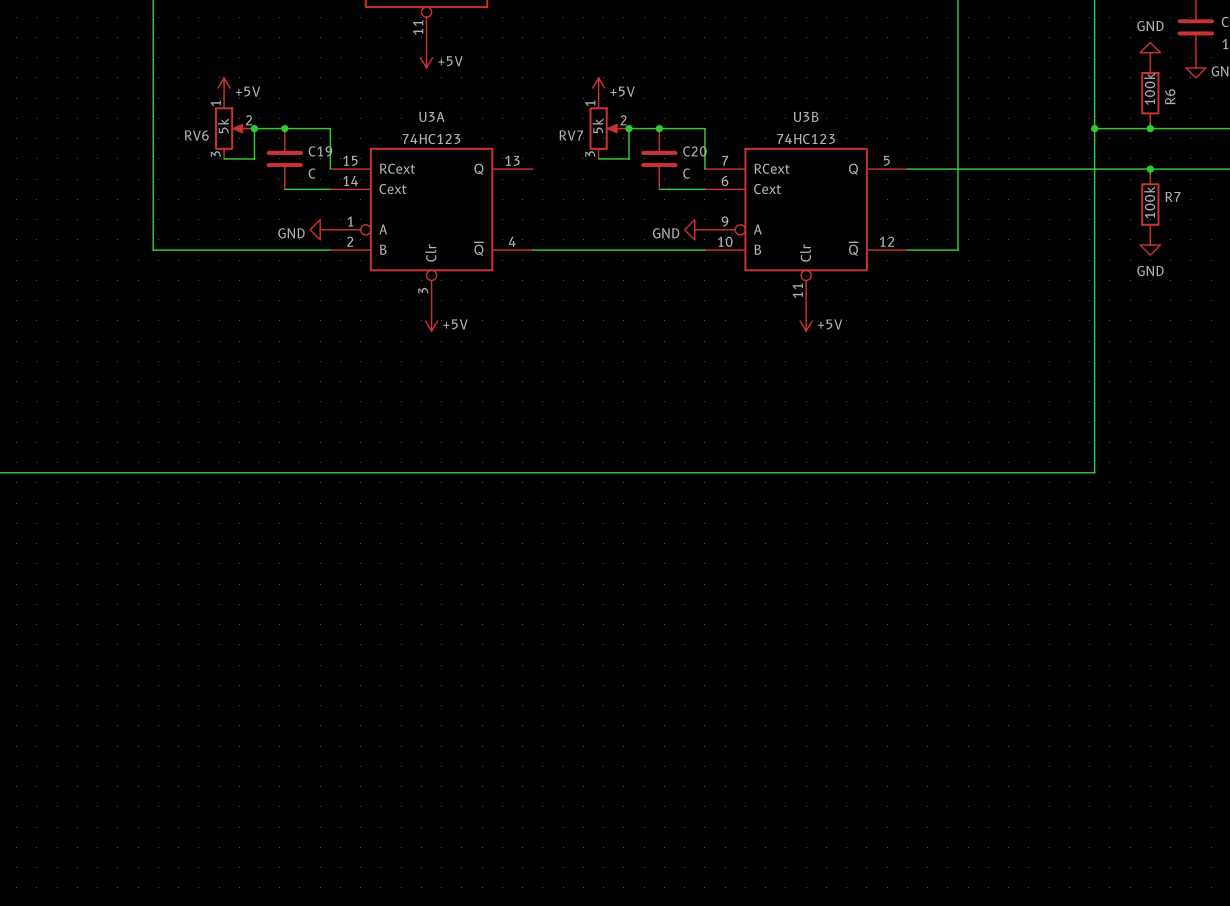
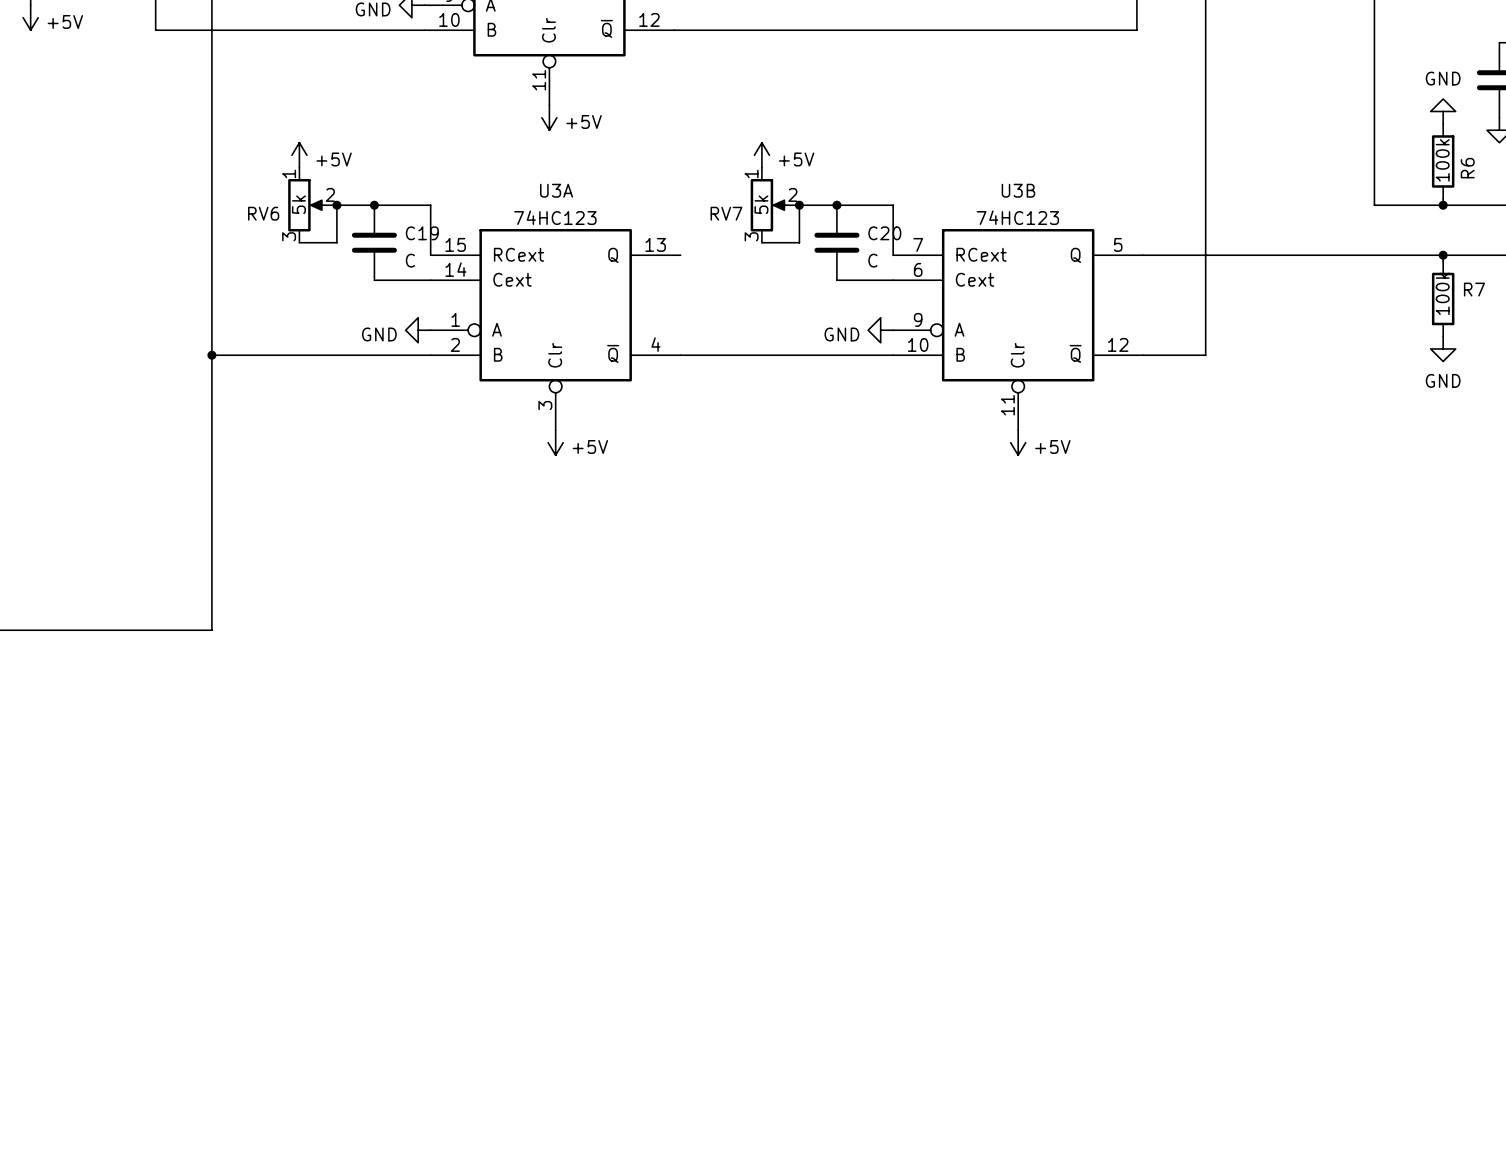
wire: (1094, 128) (1094, 472) (153, 472) -> (211, 355) (211, 630)
junction: (1094, 128) -> none
junction: none -> (211, 355)

